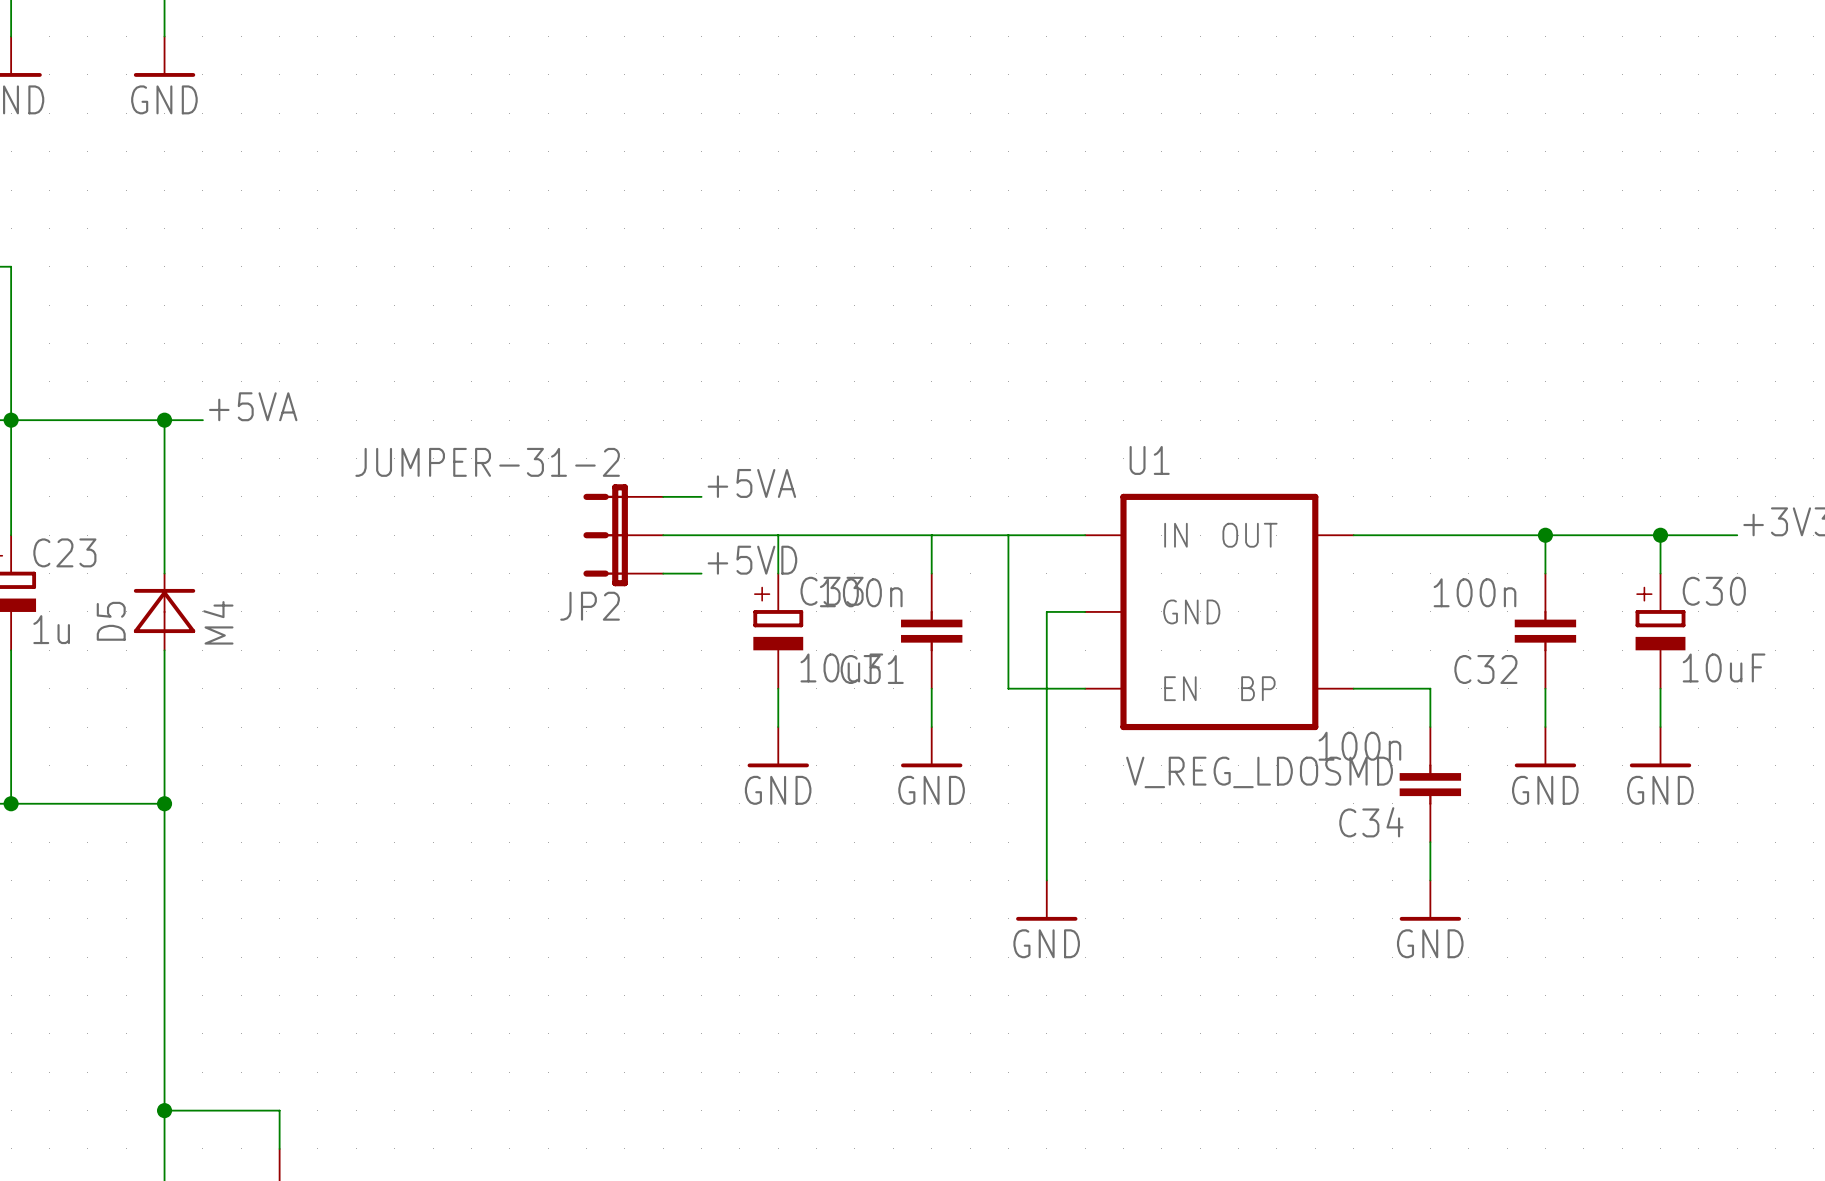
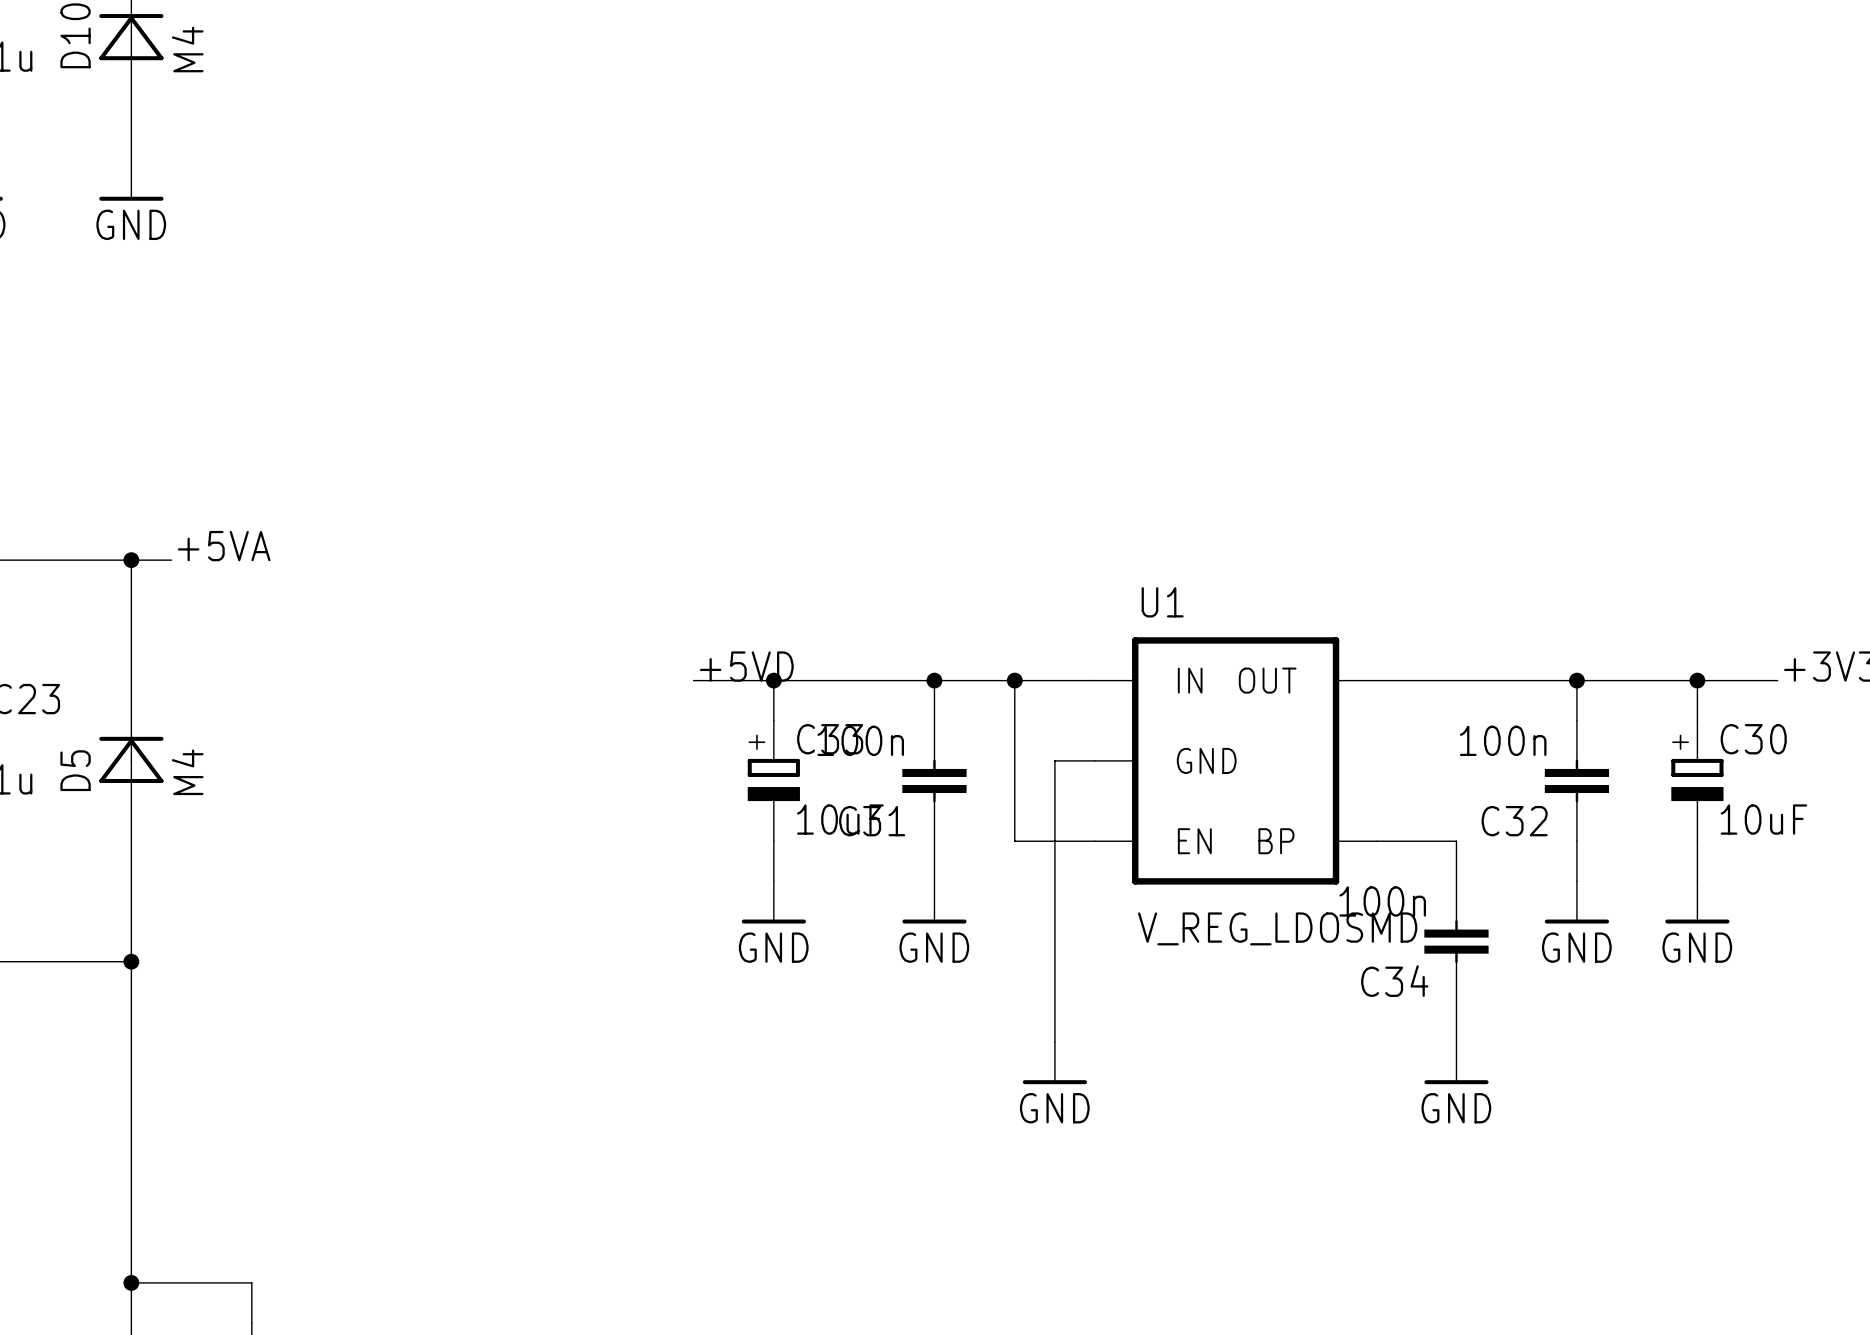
label: +5VA (751, 483) -> none
wire: (663, 496) (701, 496) -> none
JP2: JUMPER-31-2 (623, 535) -> none
wire: (663, 535) (701, 535) -> none
junction: none -> (773, 680)
junction: none -> (934, 680)
junction: none -> (1014, 680)
label position: +5VD (752, 560) -> +5VD (746, 666)
wire: (663, 573) (701, 573) -> none

